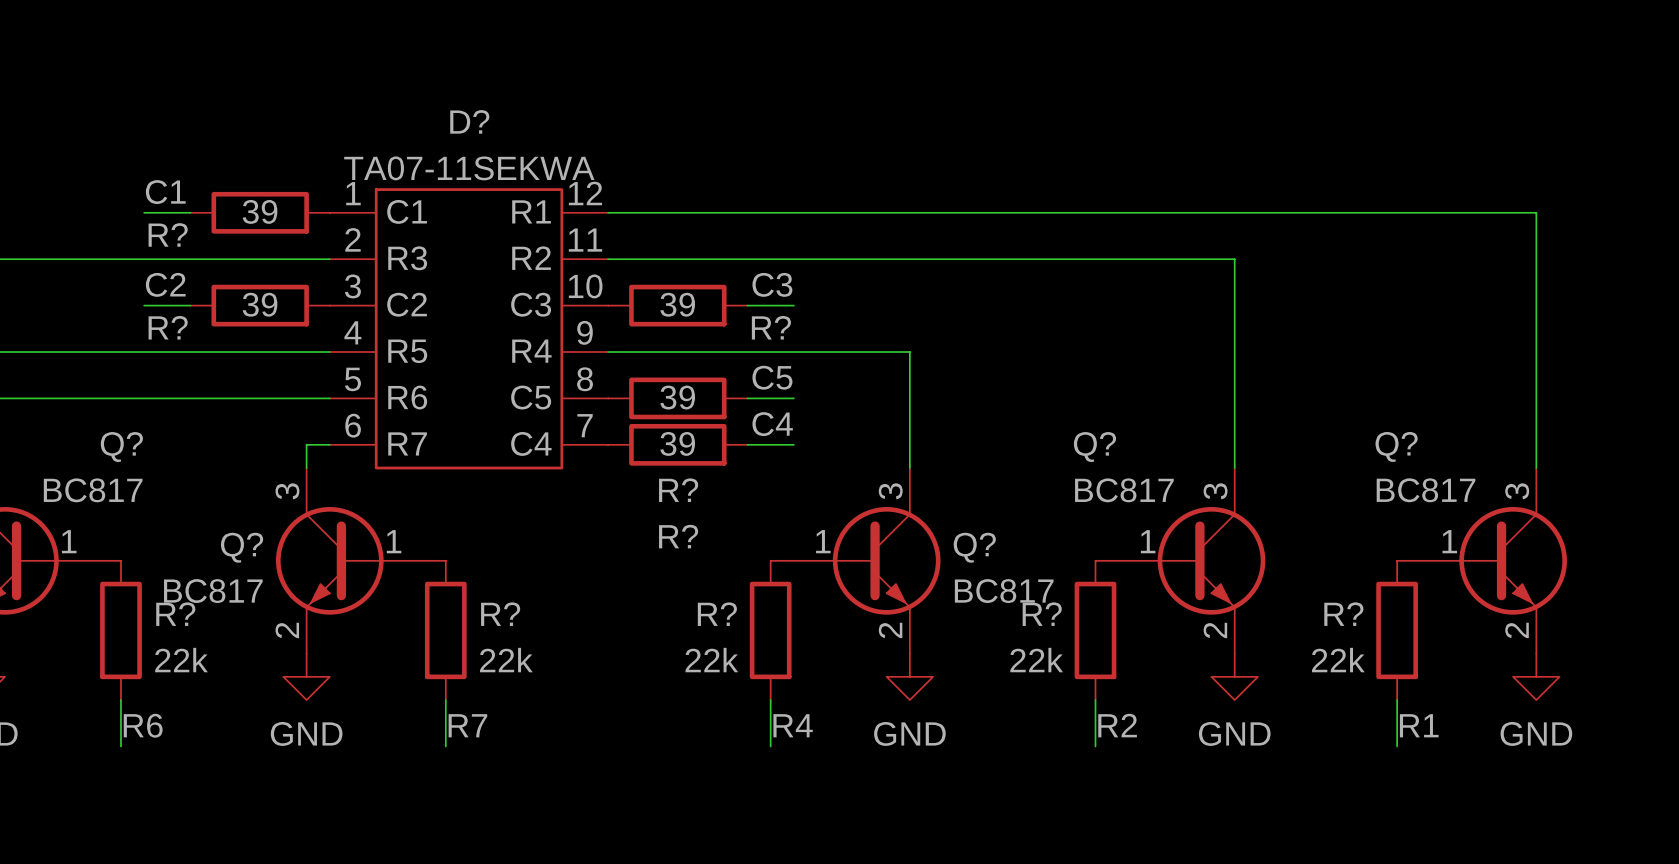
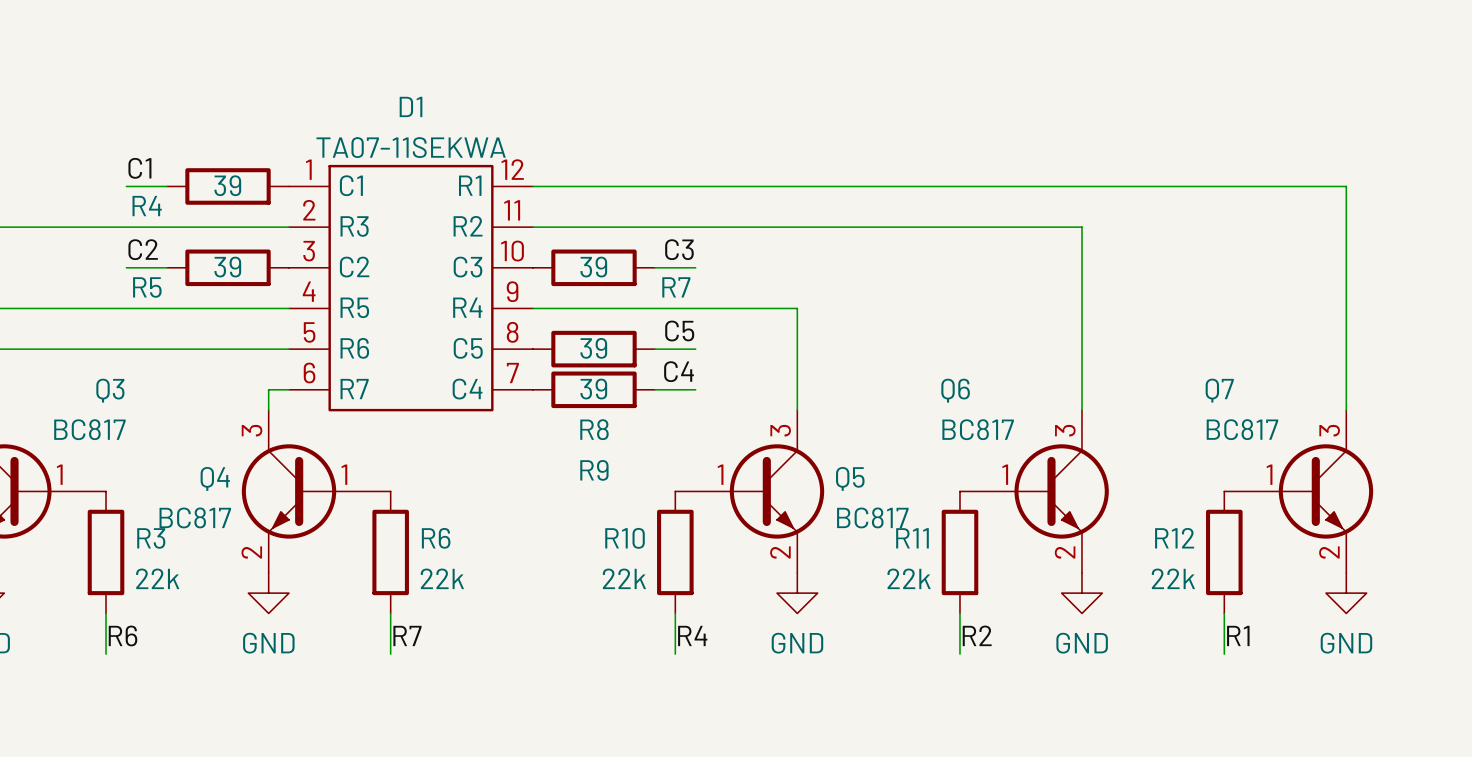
D? name: D? (469, 121) -> D1 (411, 106)
R? name: R? (168, 234) -> R4 (147, 206)
R? name: R? (168, 327) -> R5 (147, 287)
R? name: R? (771, 327) -> R7 (676, 287)
Q? name: Q? (1396, 446) -> Q7 (1219, 390)
Q? name: Q? (121, 447) -> Q3 (110, 390)
Q? name: Q? (1094, 447) -> Q6 (955, 390)
R? name: R? (678, 490) -> R8 (594, 429)
R? name: R? (678, 536) -> R9 (594, 470)
Q? name: Q? (242, 547) -> Q4 (215, 478)
Q? name: Q? (974, 547) -> Q5 (850, 478)
R? name: R? (175, 614) -> R3 (151, 538)
R? name: R? (500, 614) -> R6 (436, 538)
R? name: R? (717, 614) -> R10 (625, 538)
R? name: R? (1042, 614) -> R11 (912, 538)
R? name: R? (1343, 614) -> R12 (1174, 538)

